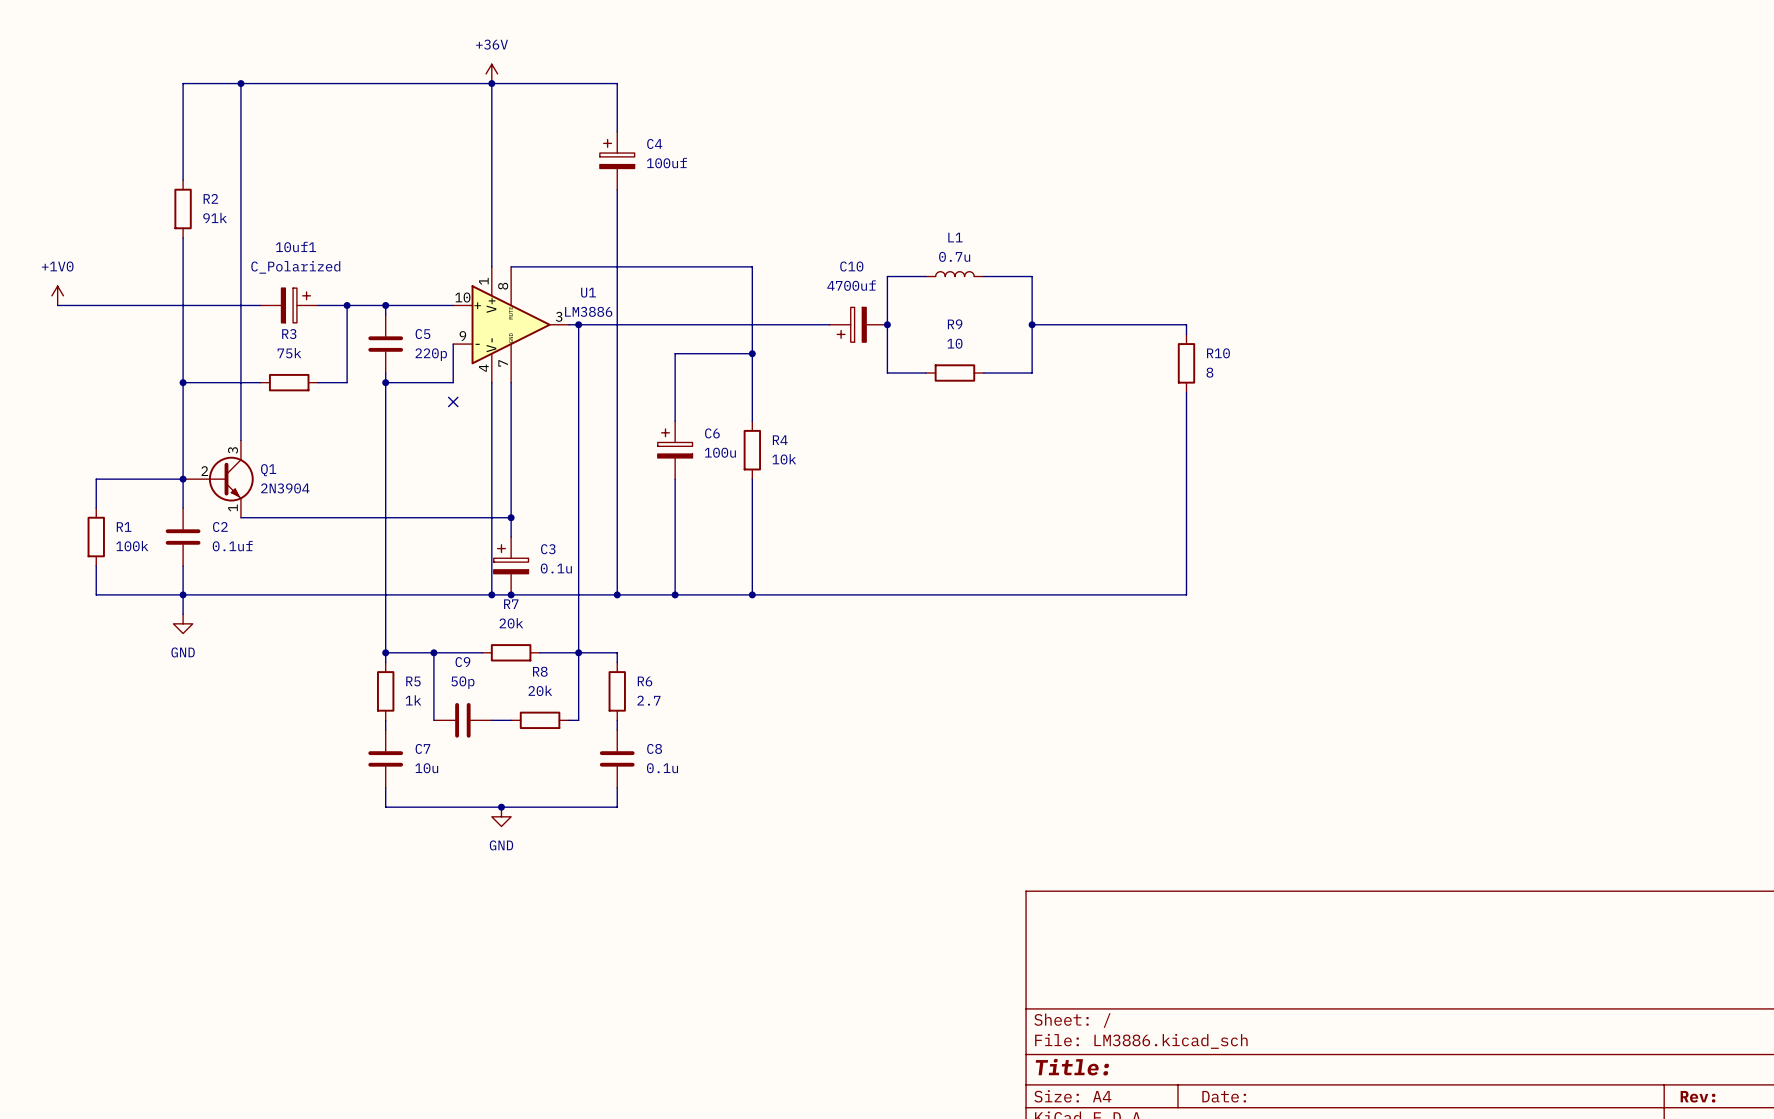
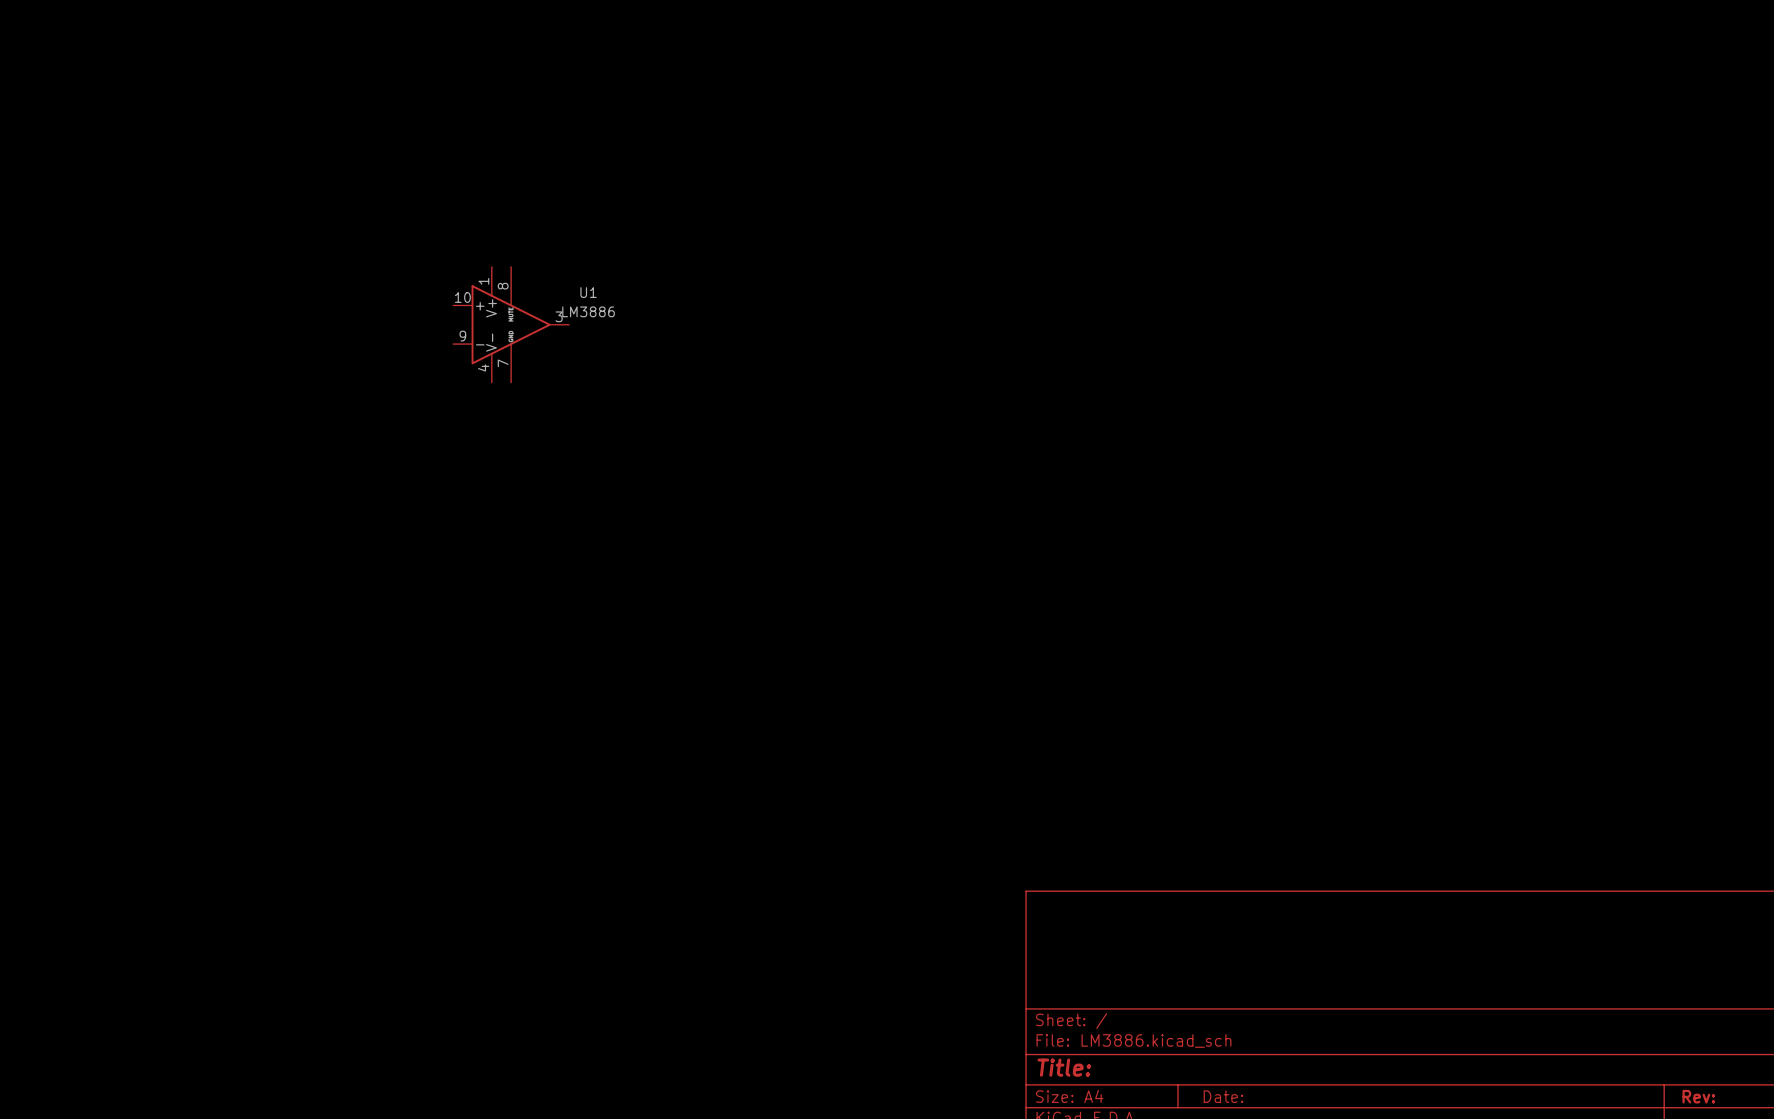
power symbol: +36V (491, 73) -> none
wire: (240, 83) (240, 440) -> none
junction: (240, 83) -> none
wire: (491, 83) (491, 266) -> none
junction: (491, 83) -> none
wire: (617, 131) (617, 83) (183, 83) (183, 180) -> none
C4: 100uf (617, 160) -> none
wire: (617, 189) (617, 594) -> none
R2: 91k (183, 208) -> none
wire: (183, 237) (183, 508) -> none
wire: (511, 266) (752, 266) (752, 421) -> none
L1: 0.7u (954, 274) -> none
wire: (925, 276) (887, 276) (887, 373) (925, 373) -> none
wire: (983, 276) (1032, 276) (1032, 373) (983, 373) -> none
power symbol: +1V0 (57, 295) -> none
wire: (57, 305) (260, 305) -> none
10uf1: C_Polarized (289, 305) -> none
wire: (318, 305) (453, 305) -> none
wire: (347, 305) (347, 382) (318, 382) -> none
junction: (347, 305) -> none
wire: (385, 305) (385, 315) -> none
junction: (385, 305) -> none
wire: (569, 324) (829, 324) -> none
wire: (578, 324) (578, 720) (569, 720) -> none
junction: (578, 324) -> none
C10: 4700uf (858, 324) -> none
junction: (887, 324) -> none
wire: (1032, 324) (1186, 324) (1186, 334) -> none
junction: (1032, 324) -> none
C5: 220p (385, 344) -> none
wire: (453, 344) (453, 382) (385, 382) -> none
wire: (752, 353) (675, 353) (675, 421) -> none
junction: (752, 353) -> none
R10: 8 (1186, 363) -> none
wire: (385, 373) (385, 662) -> none
R9: 10 (954, 373) -> none
wire: (183, 382) (260, 382) -> none
junction: (183, 382) -> none
R3: 75k (289, 382) -> none
junction: (385, 382) -> none
wire: (491, 382) (491, 594) -> none
wire: (511, 382) (511, 537) -> none
wire: (1186, 392) (1186, 594) (96, 594) (96, 565) -> none
no-connect mark: (453, 401) -> none
C6: 100u (675, 450) -> none
R4: 10k (752, 450) -> none
wire: (183, 479) (96, 479) (96, 508) -> none
junction: (183, 479) -> none
Q1: 2N3904 (218, 479) -> none
wire: (675, 479) (675, 594) -> none
wire: (752, 479) (752, 594) -> none
wire: (240, 517) (511, 517) -> none
junction: (511, 517) -> none
R1: 100k (96, 537) -> none
C2: 0.1uf (183, 537) -> none
wire: (183, 565) (183, 614) -> none
C3: 0.1u (511, 565) -> none
junction: (183, 594) -> none
junction: (491, 594) -> none
junction: (511, 594) -> none
junction: (617, 594) -> none
junction: (675, 594) -> none
junction: (752, 594) -> none
power symbol: GND (183, 623) -> none
wire: (385, 652) (482, 652) -> none
junction: (385, 652) -> none
wire: (433, 652) (433, 720) -> none
junction: (433, 652) -> none
R7: 20k (511, 652) -> none
wire: (540, 652) (617, 652) (617, 662) -> none
junction: (578, 652) -> none
R5: 1k (385, 691) -> none
R6: 2.7 (617, 691) -> none
wire: (385, 720) (385, 729) -> none
C9: 50p (462, 720) -> none
wire: (491, 720) (511, 720) -> none
R8: 20k (540, 720) -> none
wire: (617, 720) (617, 729) -> none
C7: 10u (385, 758) -> none
C8: 0.1u (617, 758) -> none
wire: (385, 787) (385, 807) (617, 807) (617, 787) -> none
junction: (501, 807) -> none
power symbol: GND (501, 816) -> none

